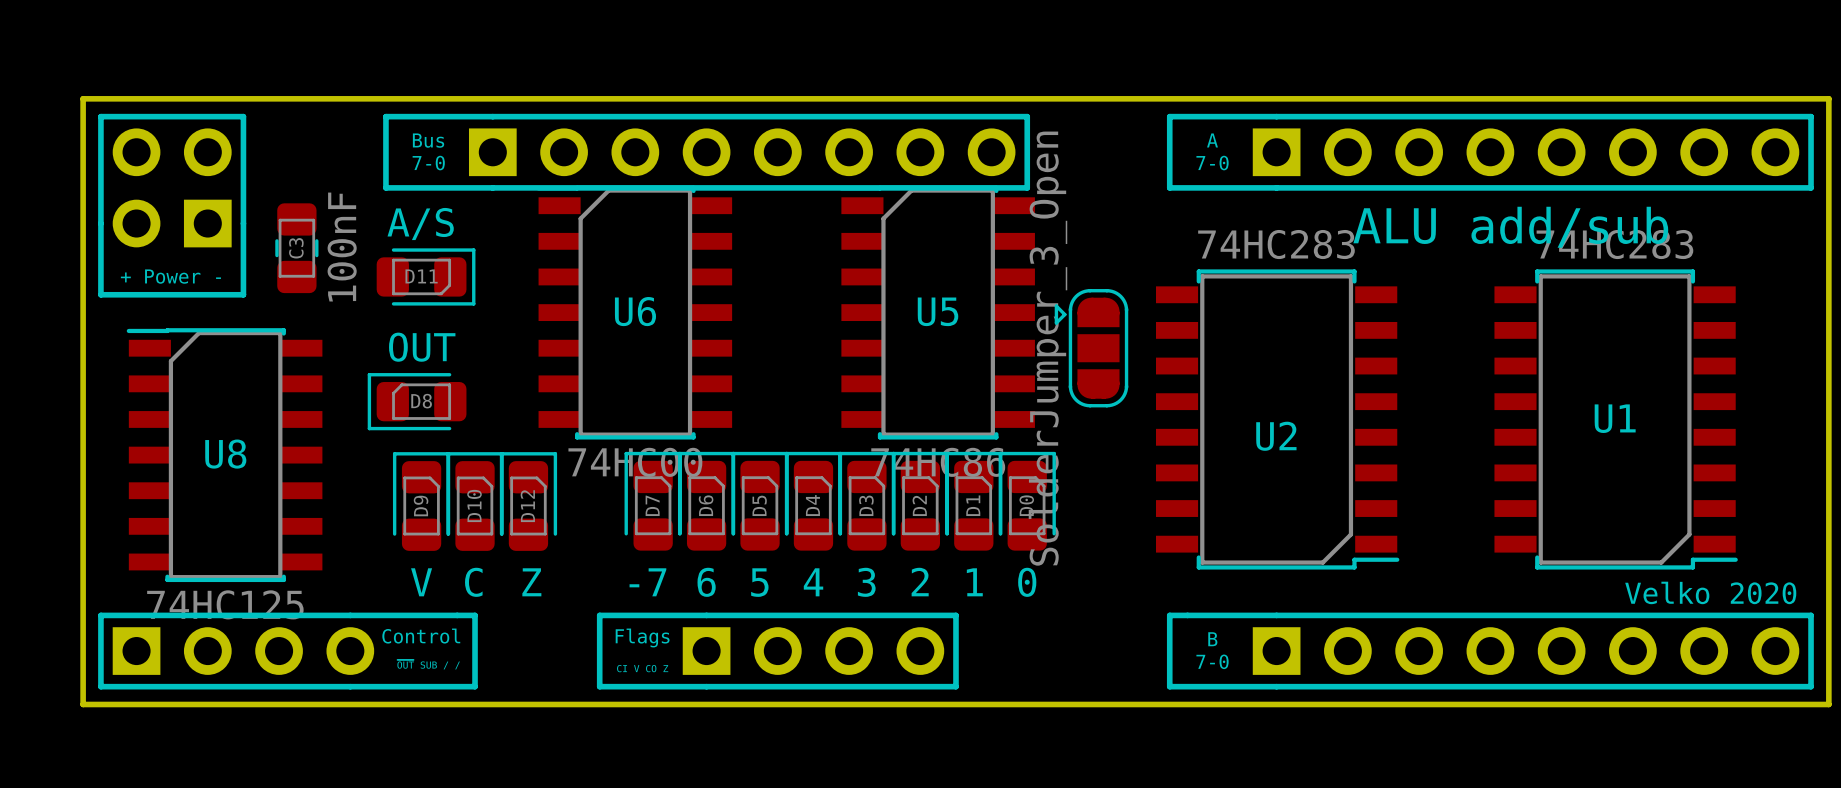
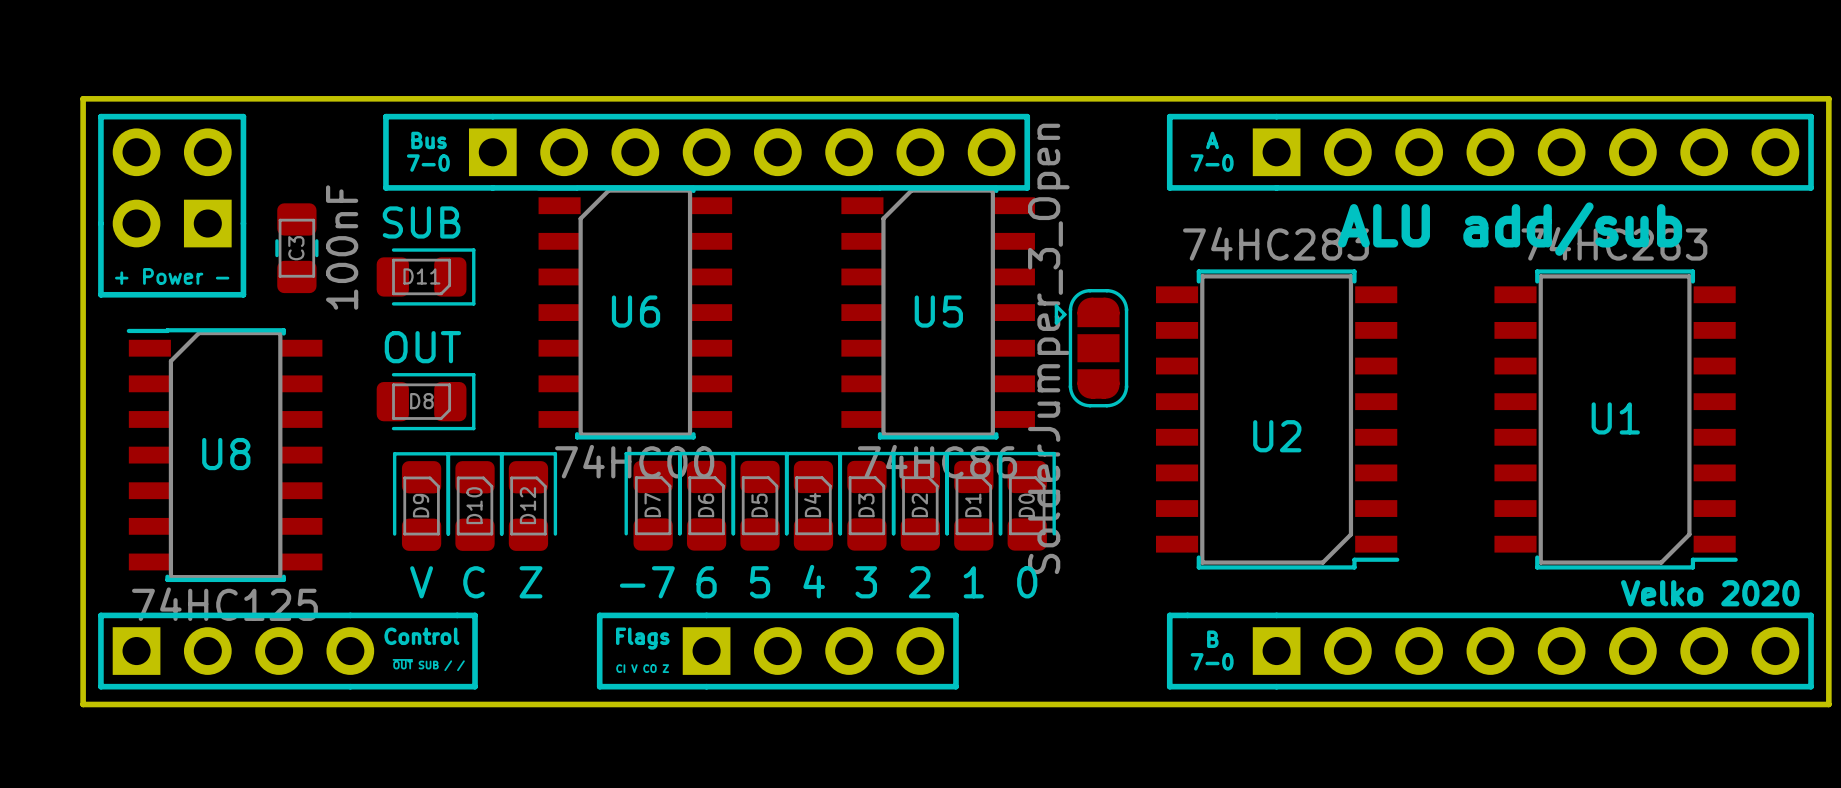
D11 value: A/S (420, 224) -> SUB (421, 222)
D8 rotation: 0° (417, 401) -> 180° (426, 401)

